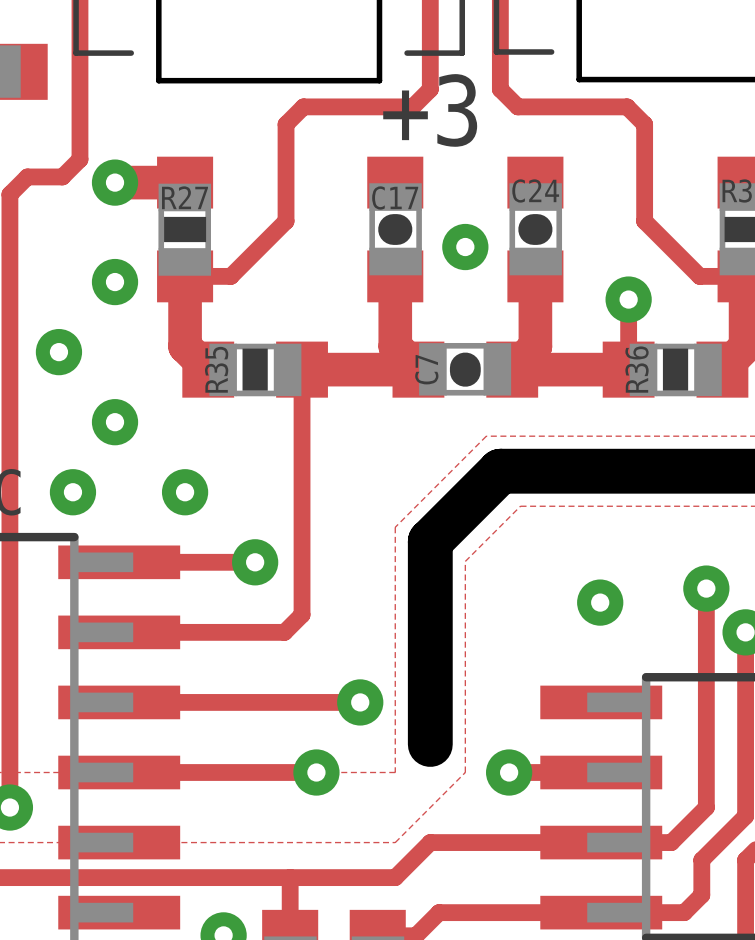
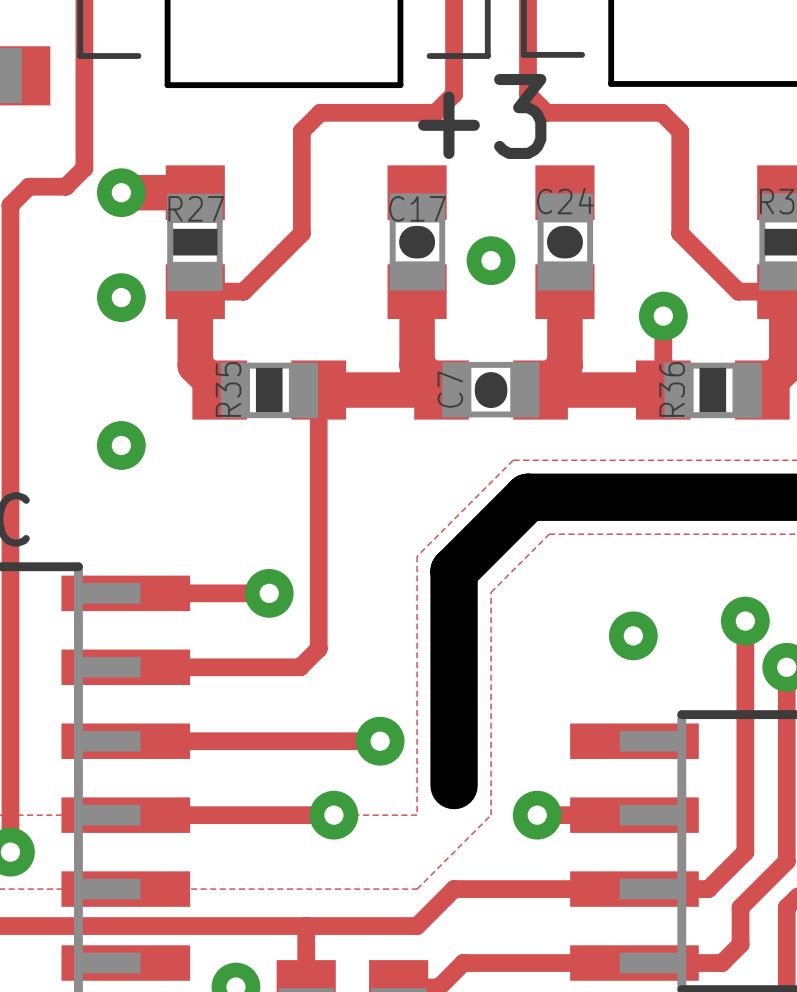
via: (58, 352) -> none
via: (72, 492) -> none
via: (185, 492) -> none

